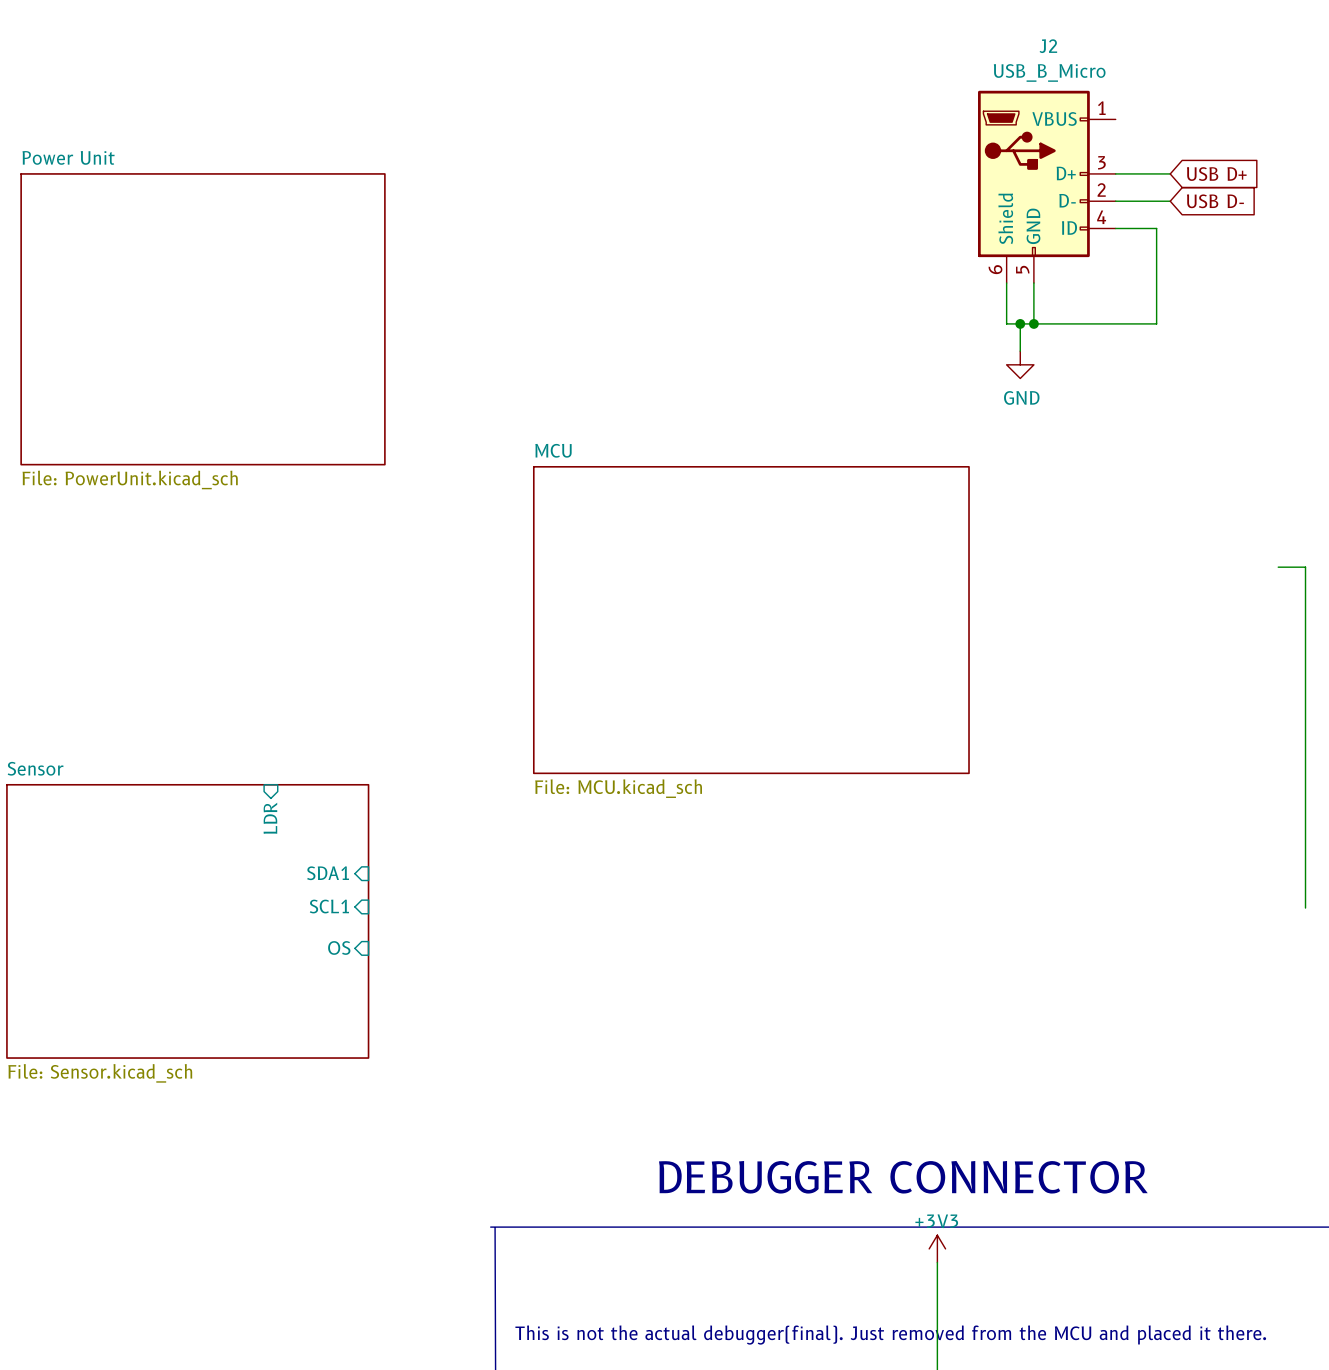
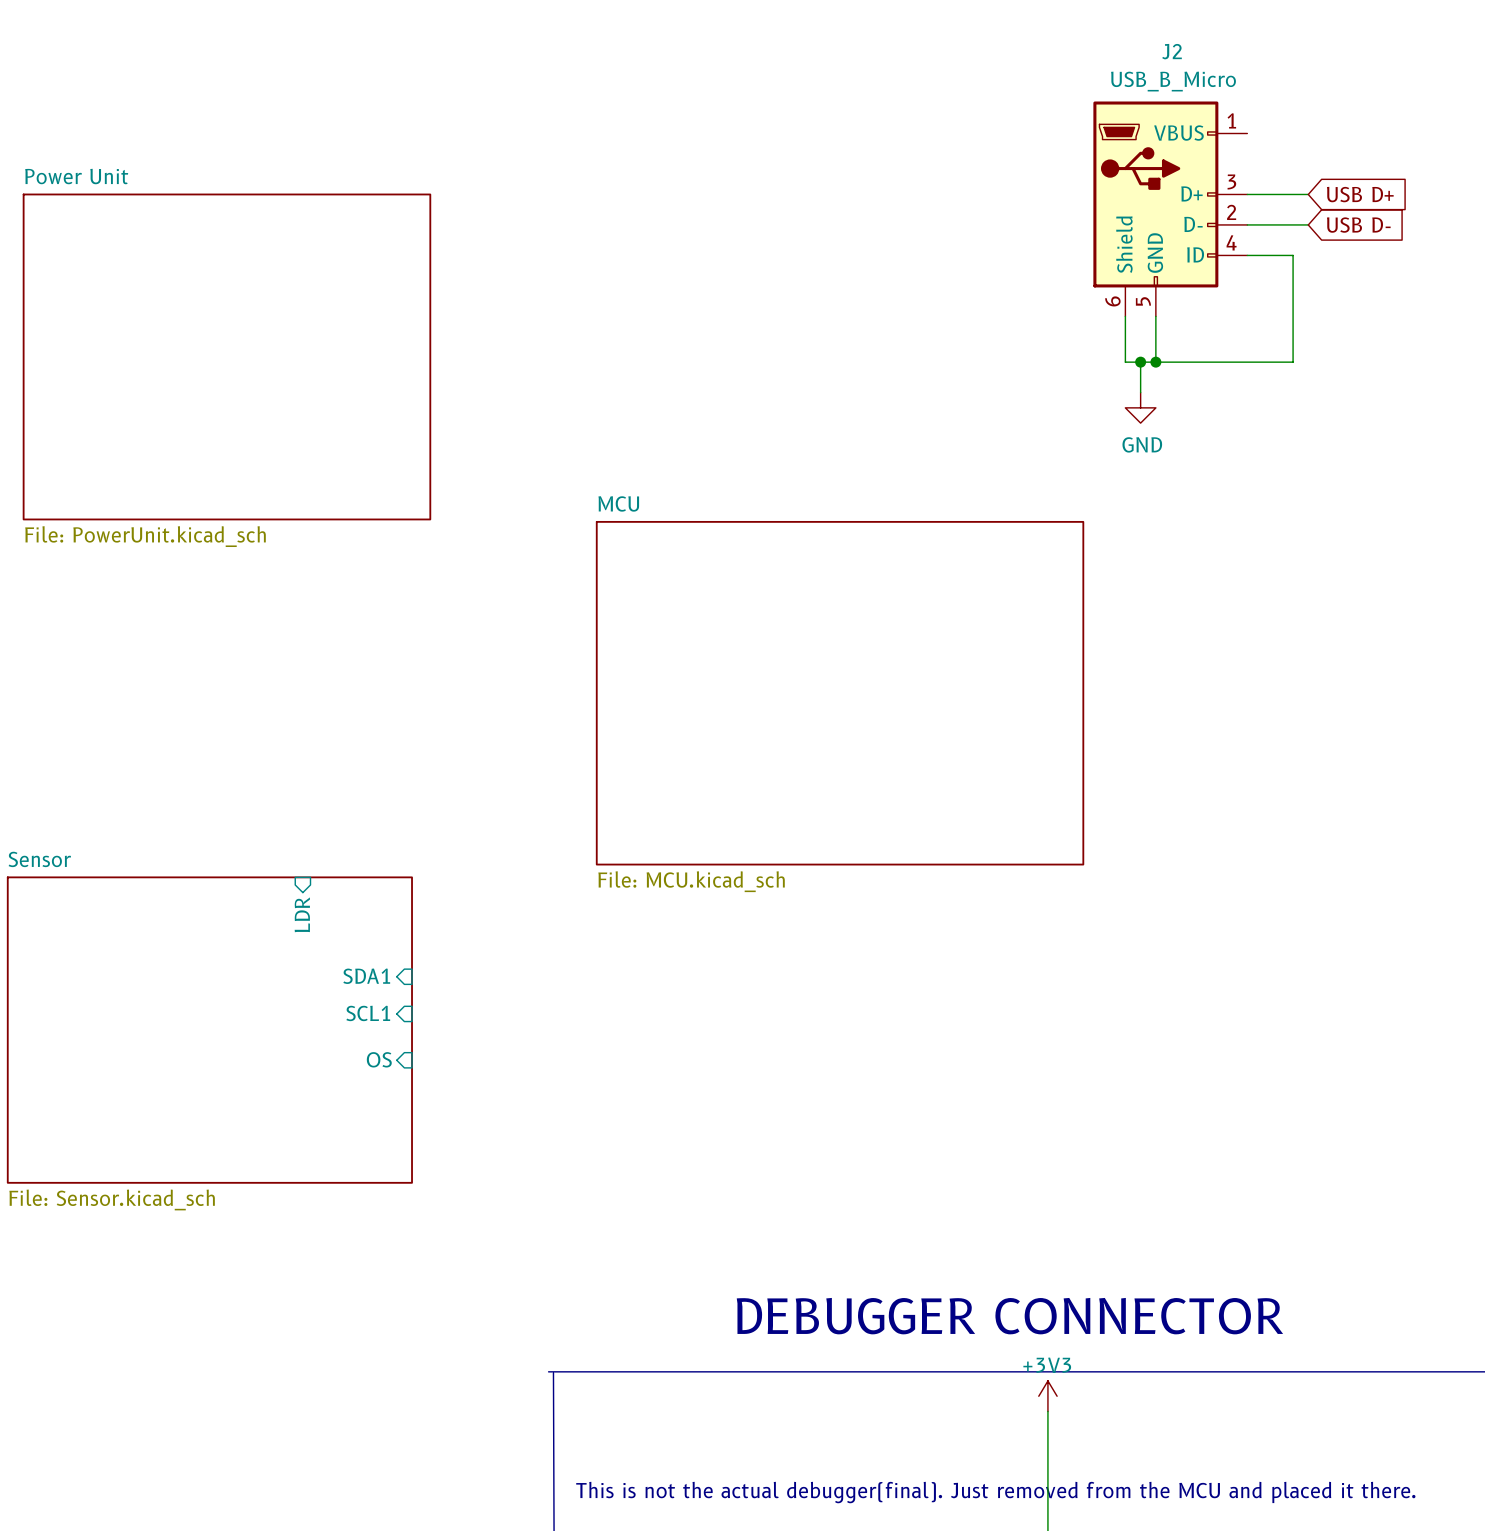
wire: (1278, 567) (1305, 567) (1305, 908) -> none

